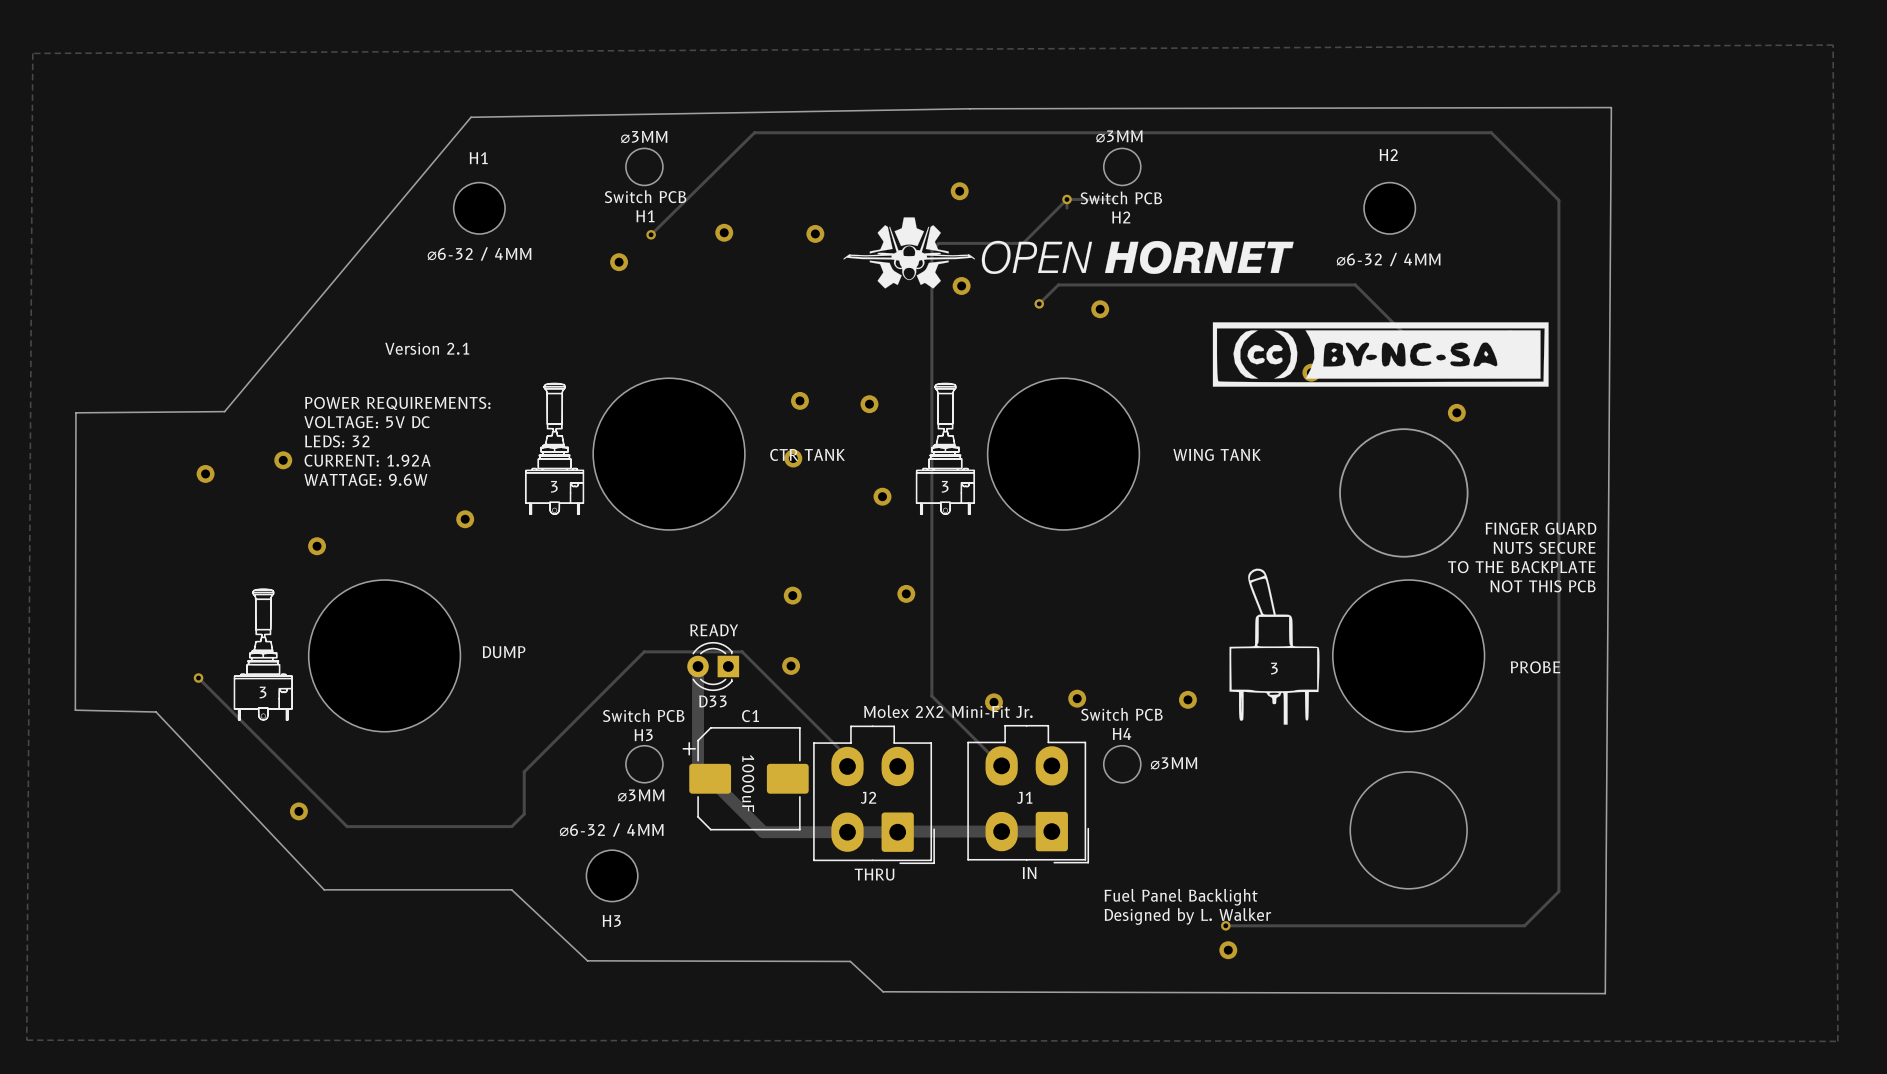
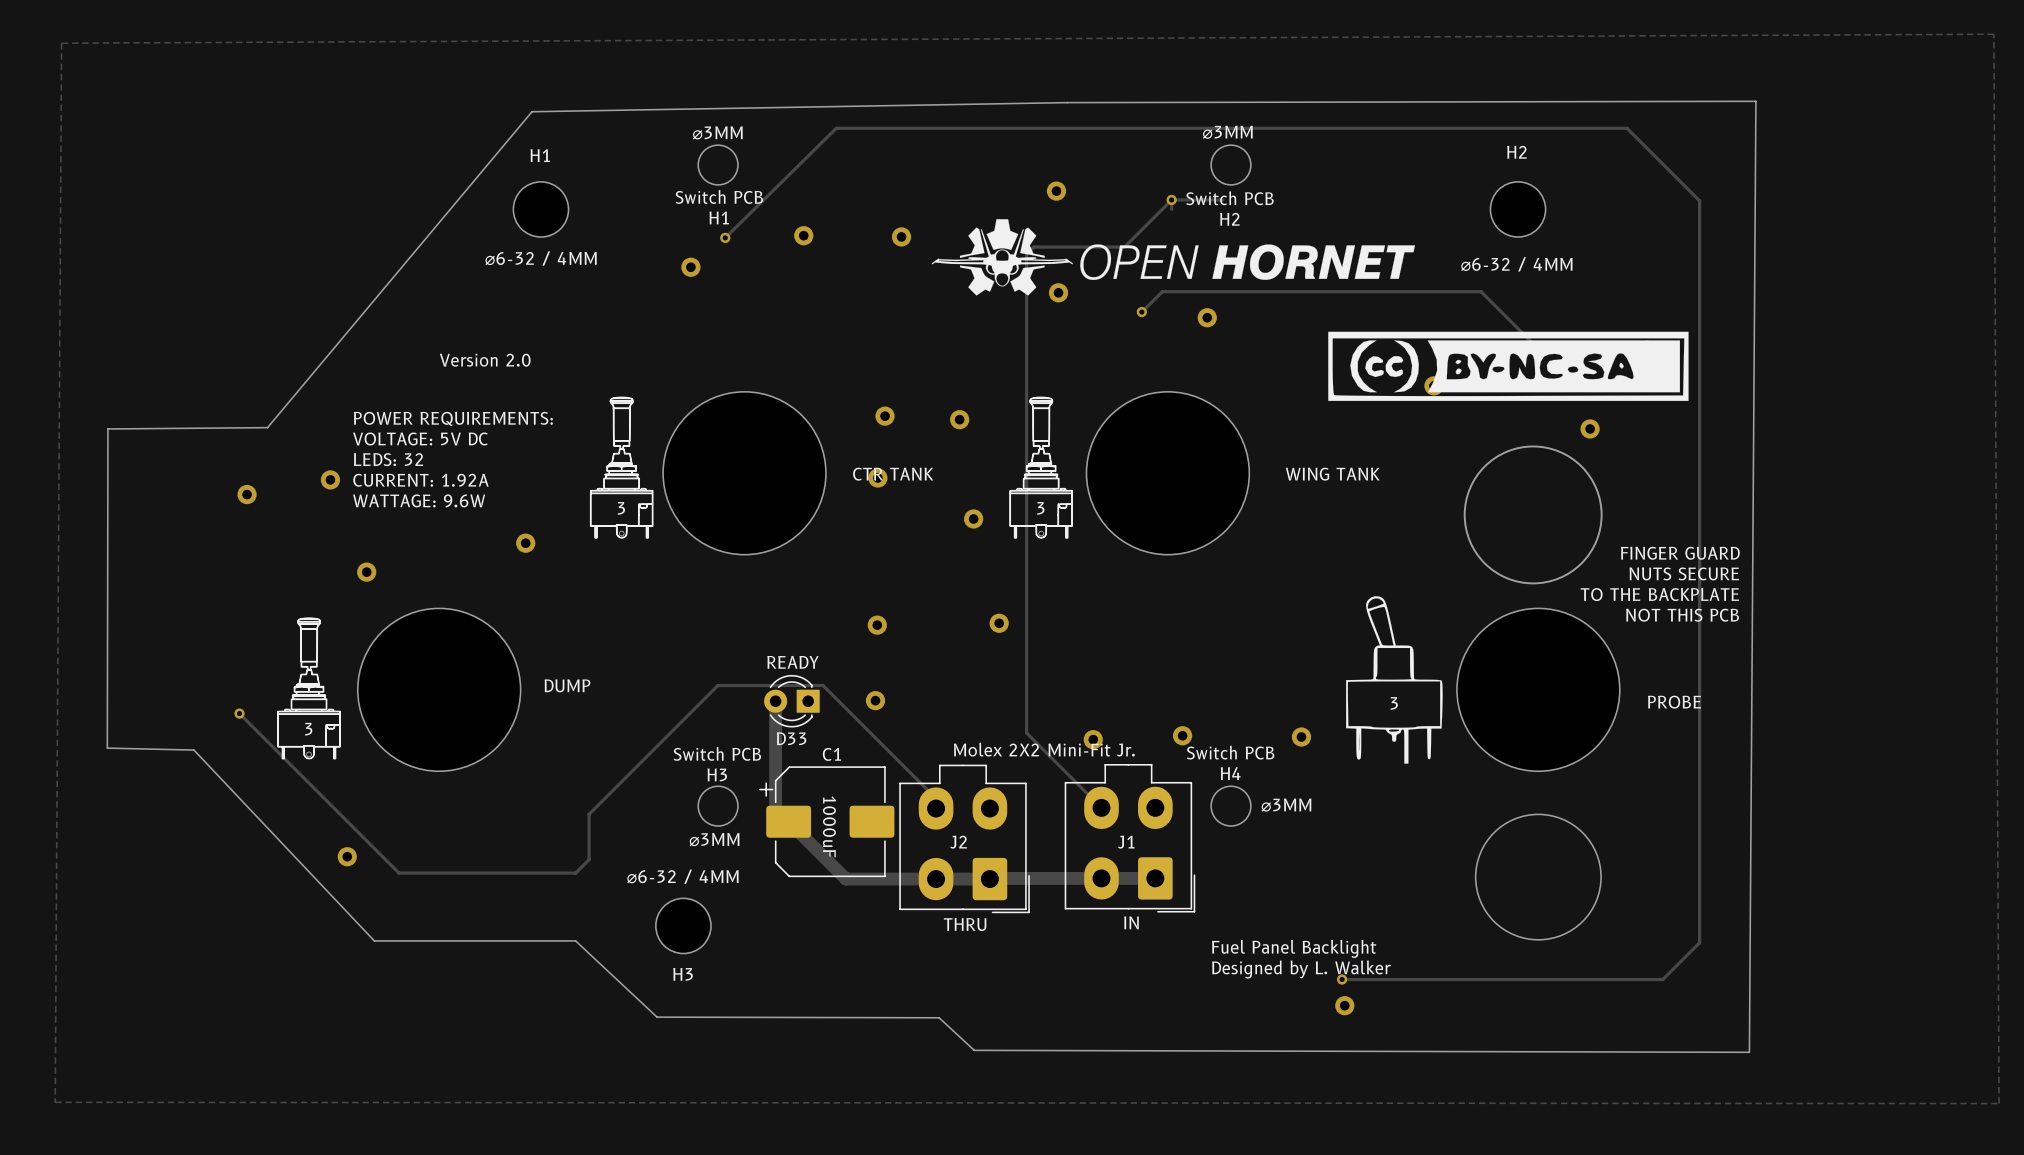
text: Version 2.1 (427, 348) -> Version 2.0 (485, 360)

